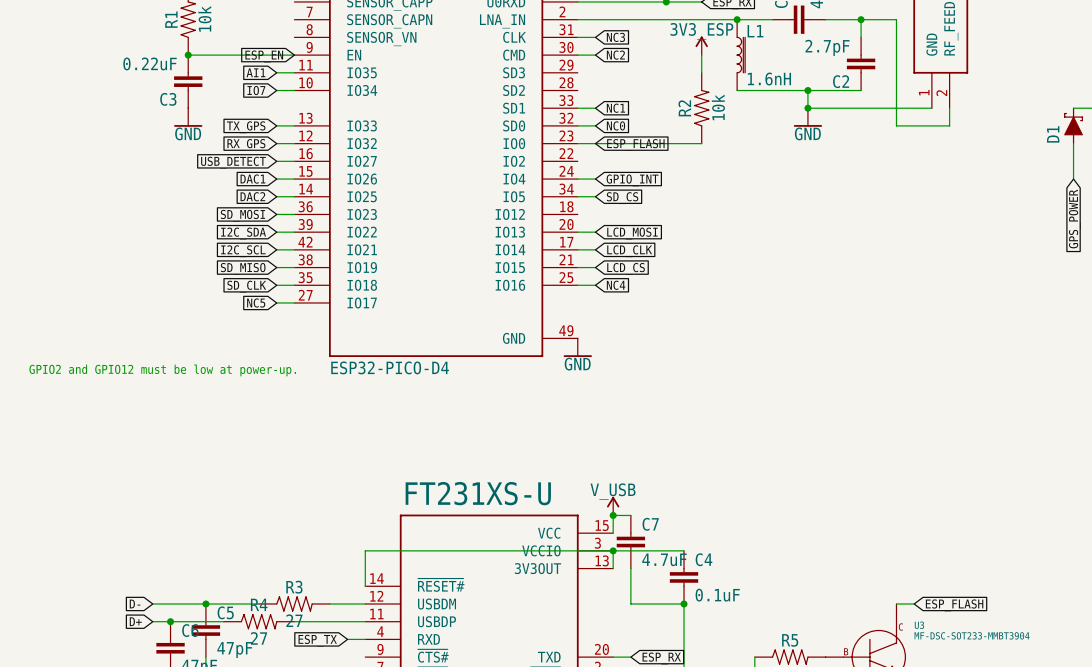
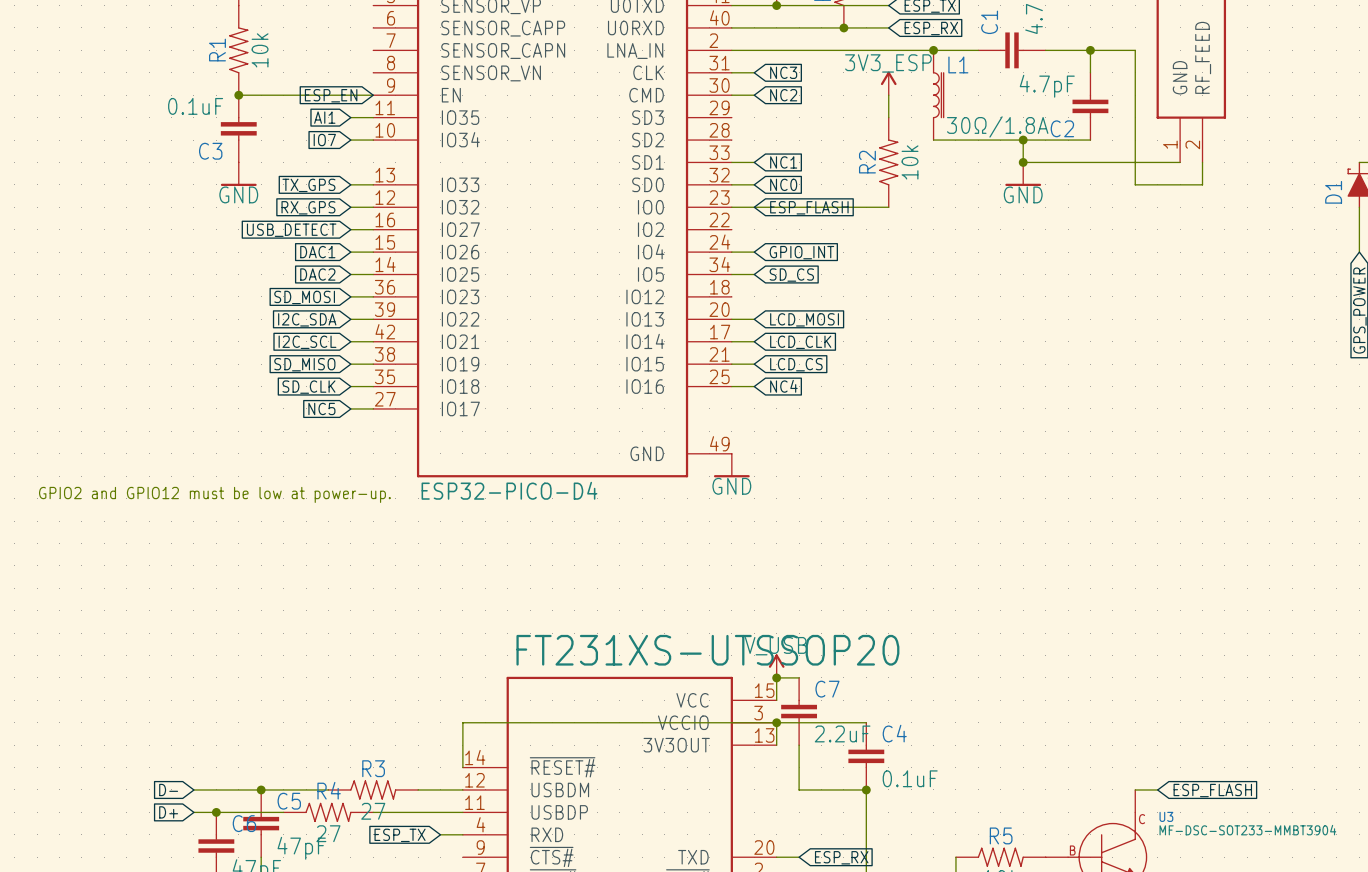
C2 value: 2.7pF (827, 47) -> 4.7pF (1047, 86)
C3 value: 0.22uF (150, 63) -> 0.1uF (195, 106)
L1 value: 1.6nH (769, 79) -> 30Ω/1.8A (997, 126)
part value: FT231XS-U (478, 493) -> FT231XS-UTSSOP20 (707, 650)
C7 value: 4.7uF (664, 559) -> 2.2uF (842, 733)

